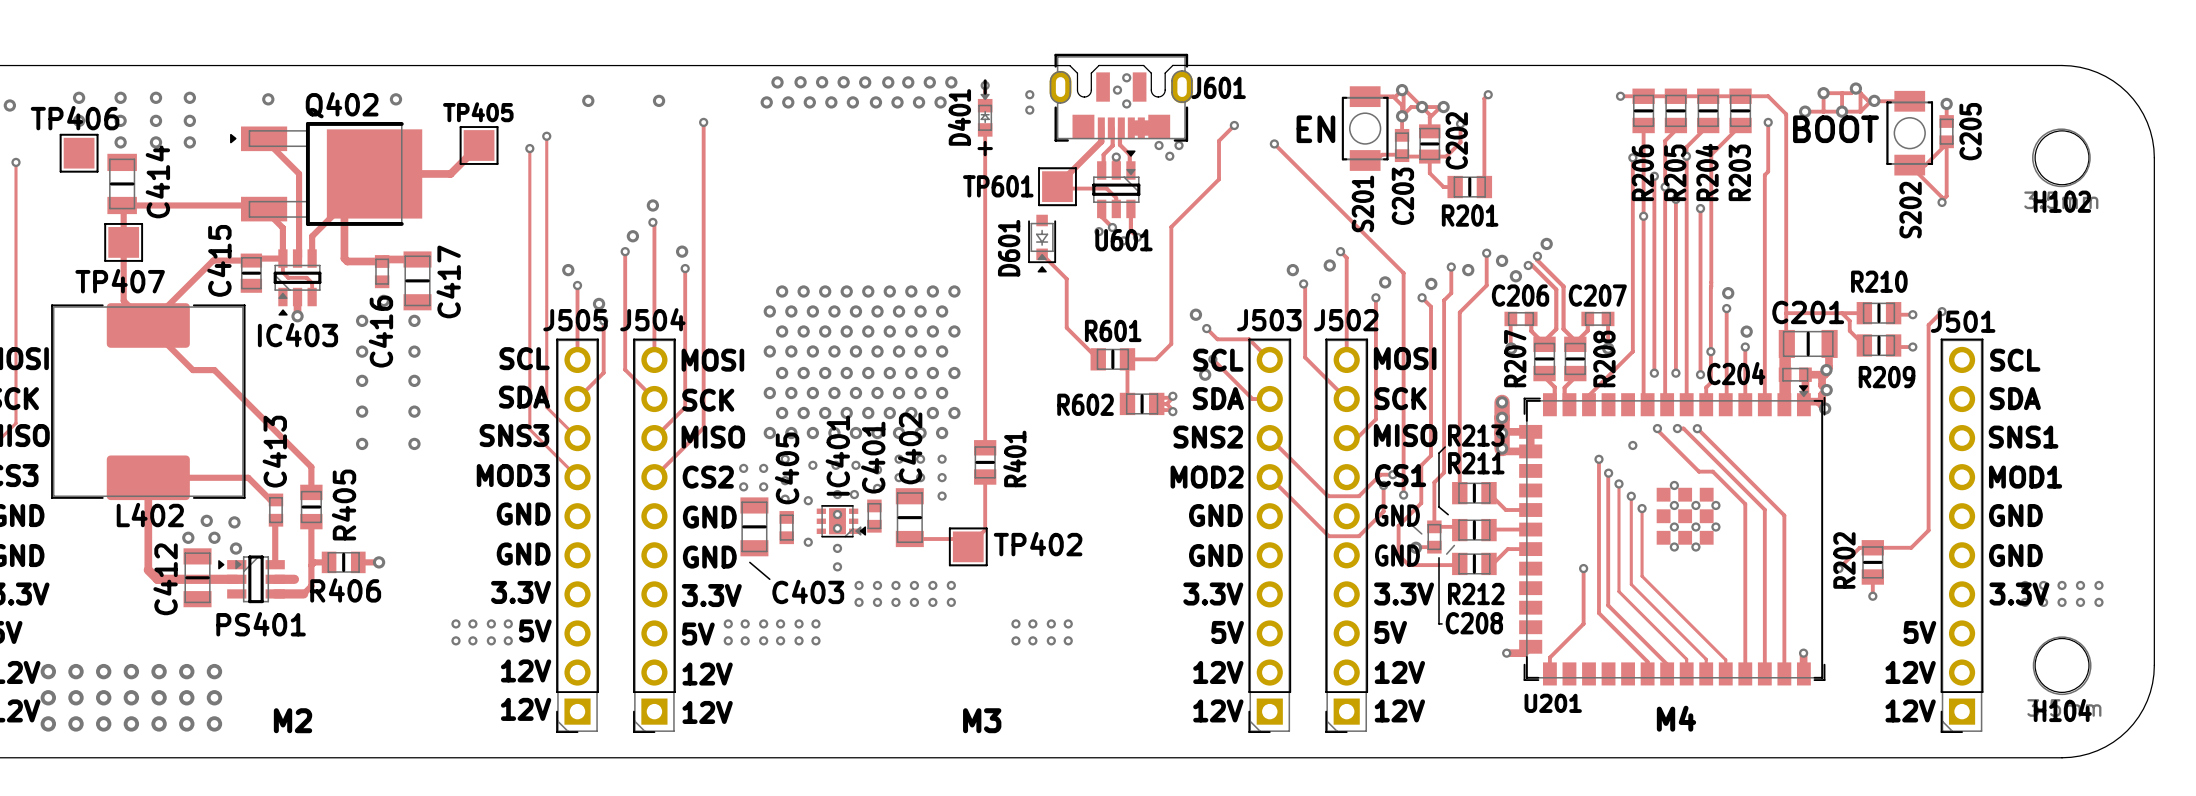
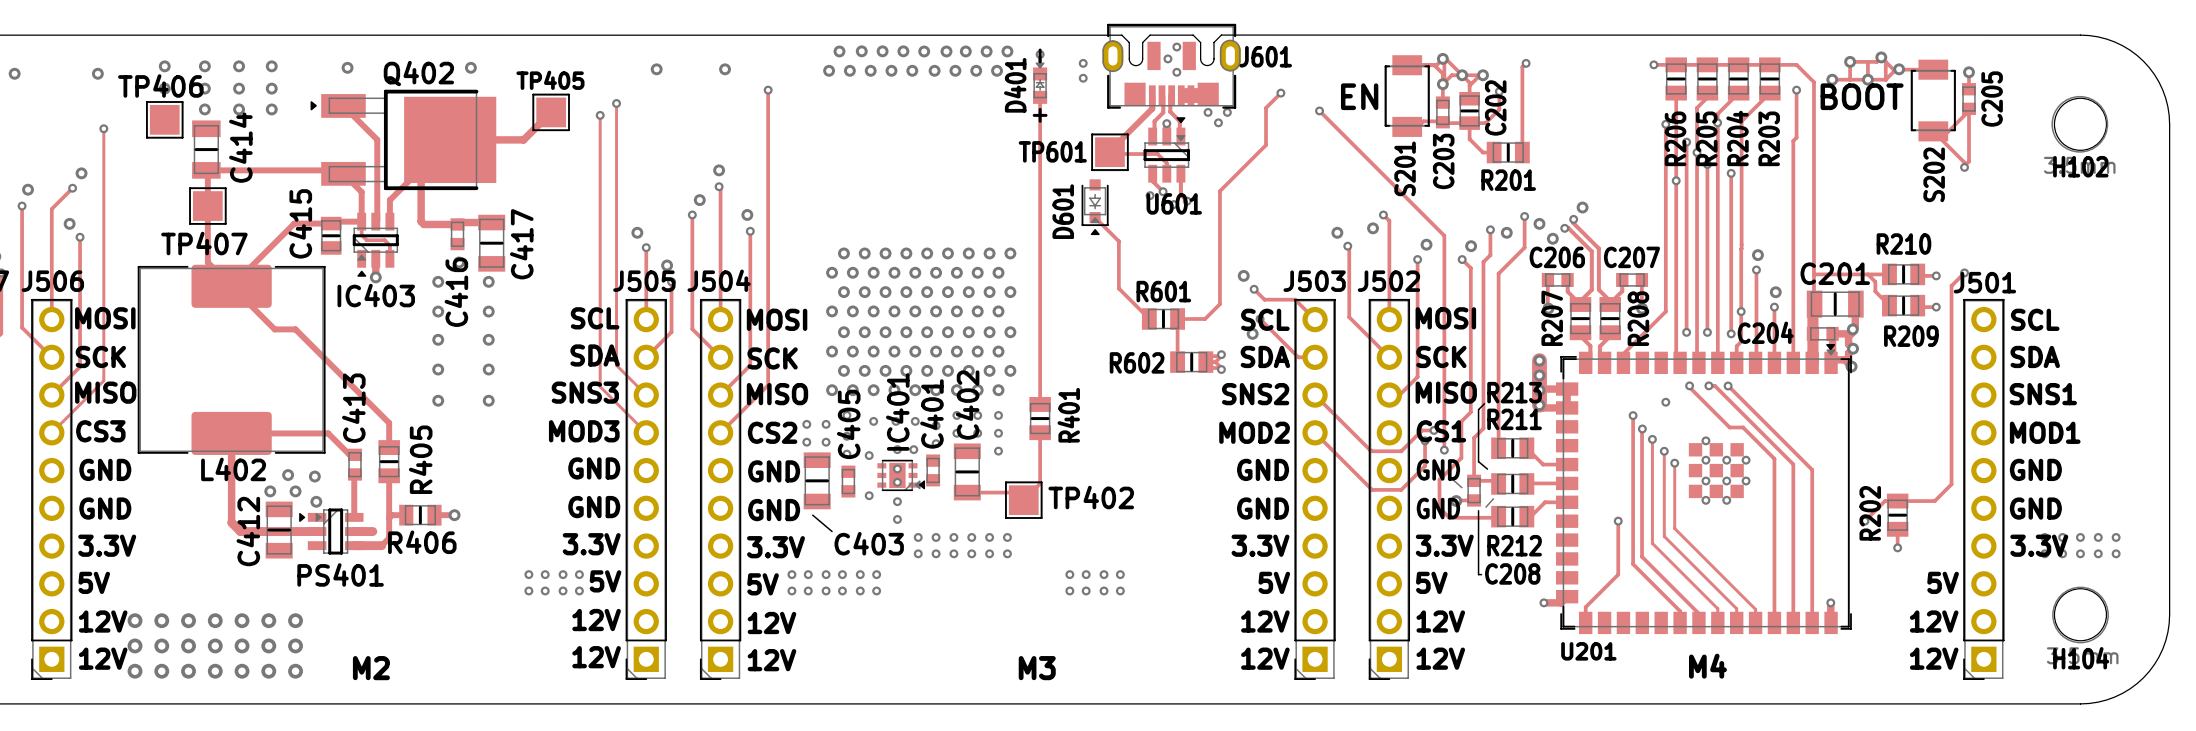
S201 footprint: [1341, 86, 1389, 171] -> [1384, 55, 1430, 137]
S202 footprint: [1886, 90, 1934, 176] -> [1910, 59, 1956, 142]

